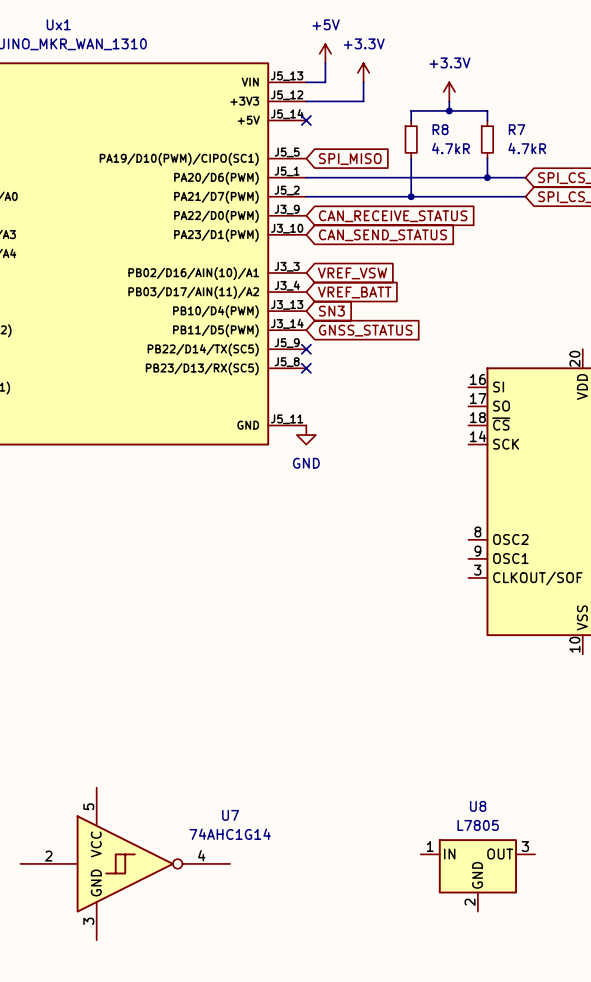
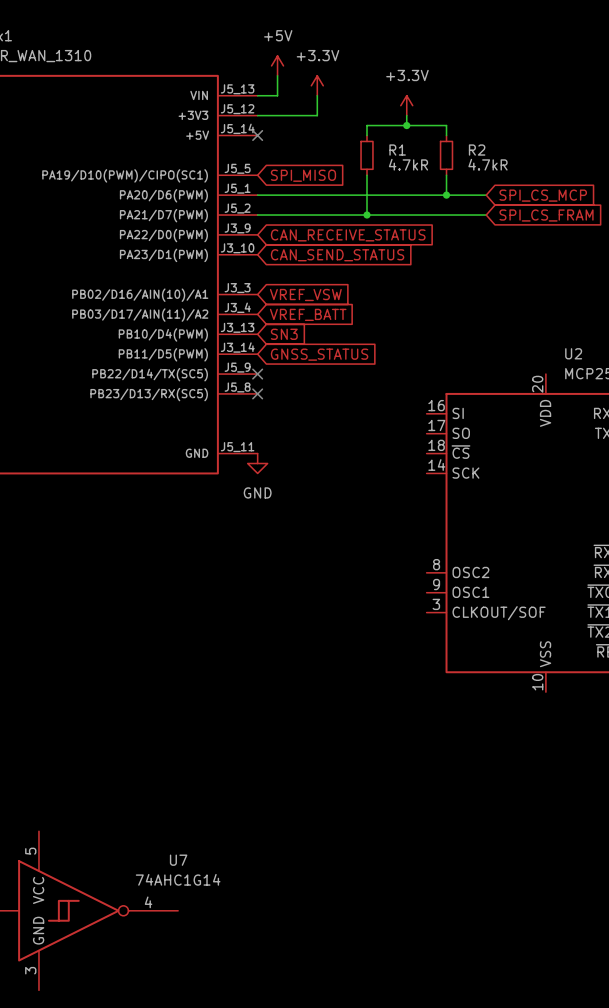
R8 name: R8 (440, 129) -> R1 (397, 150)
R7 name: R7 (517, 129) -> R2 (477, 150)
U8: L7805 (477, 875) -> none

